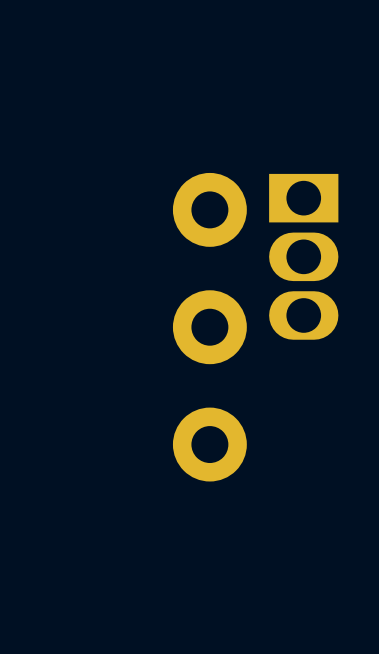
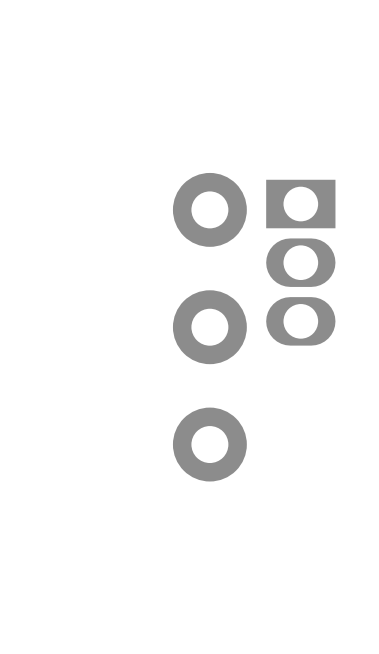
part footprint: [269, 173, 339, 340] -> [266, 179, 336, 346]

